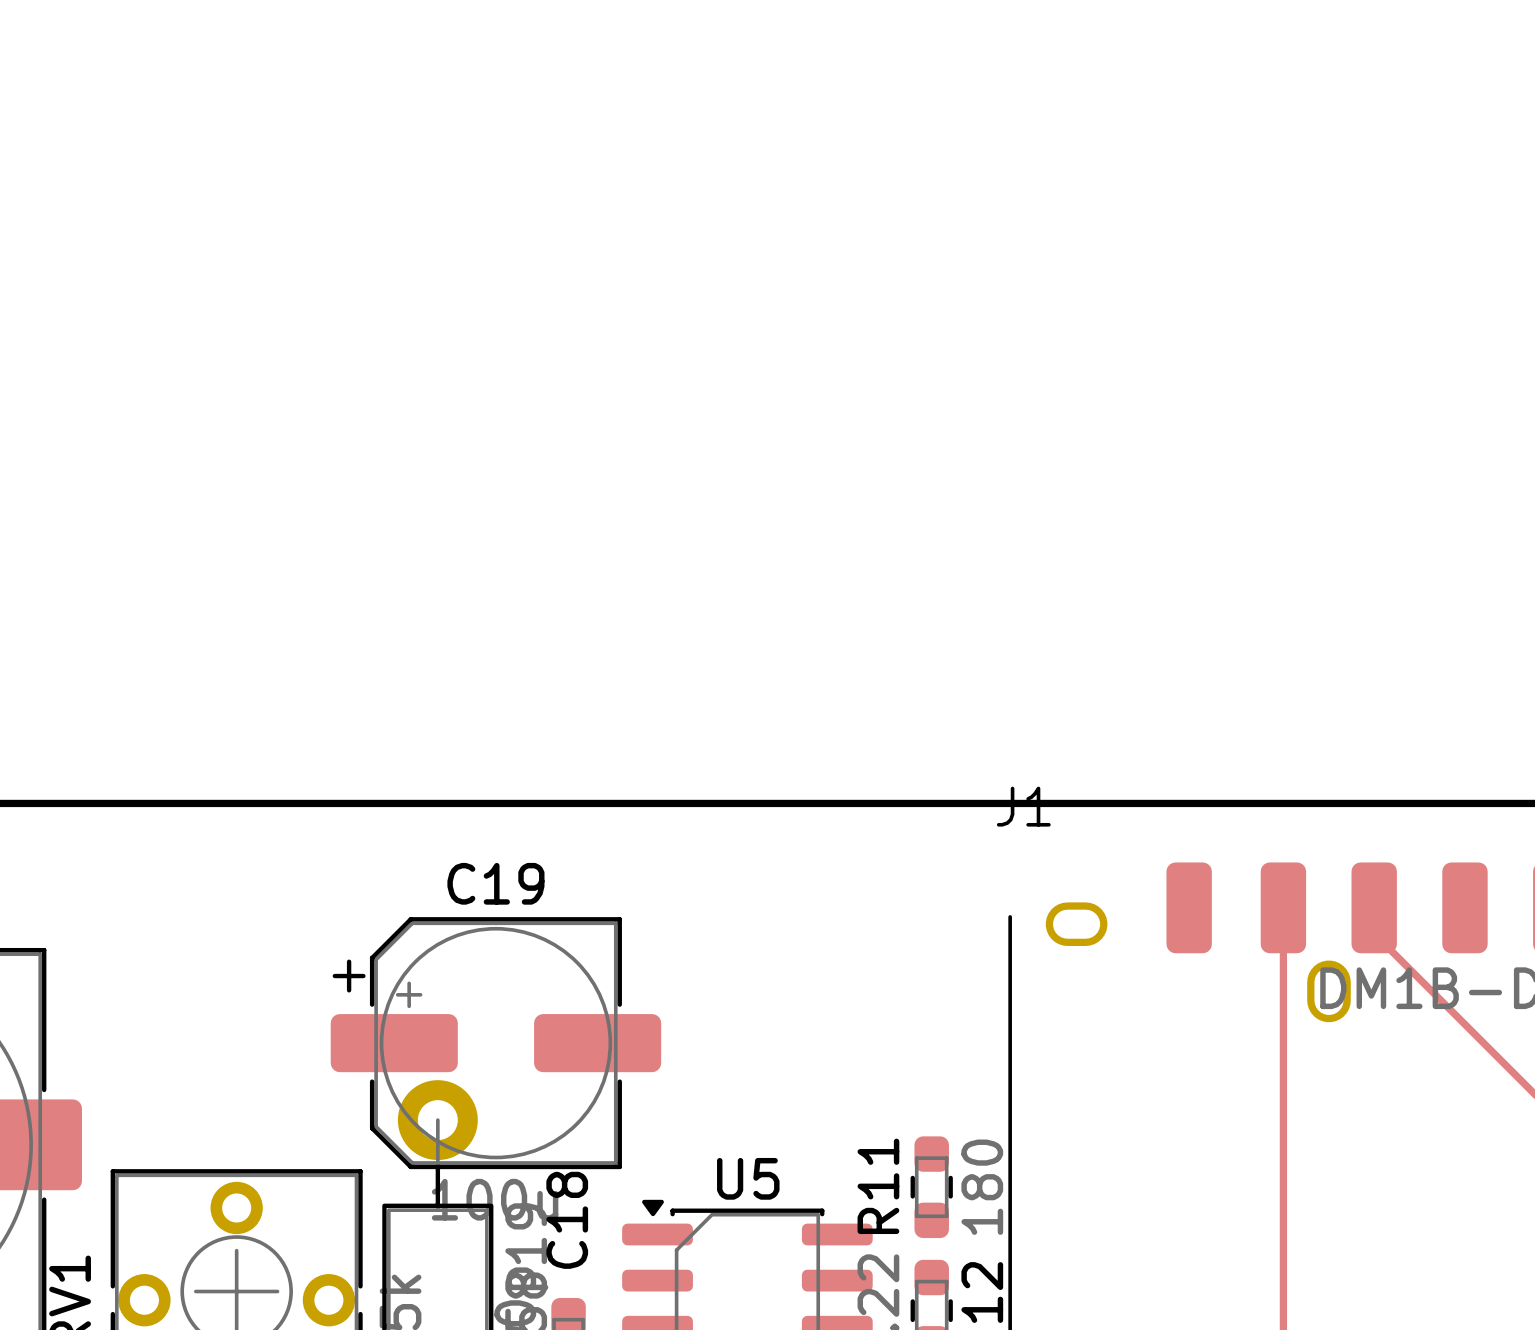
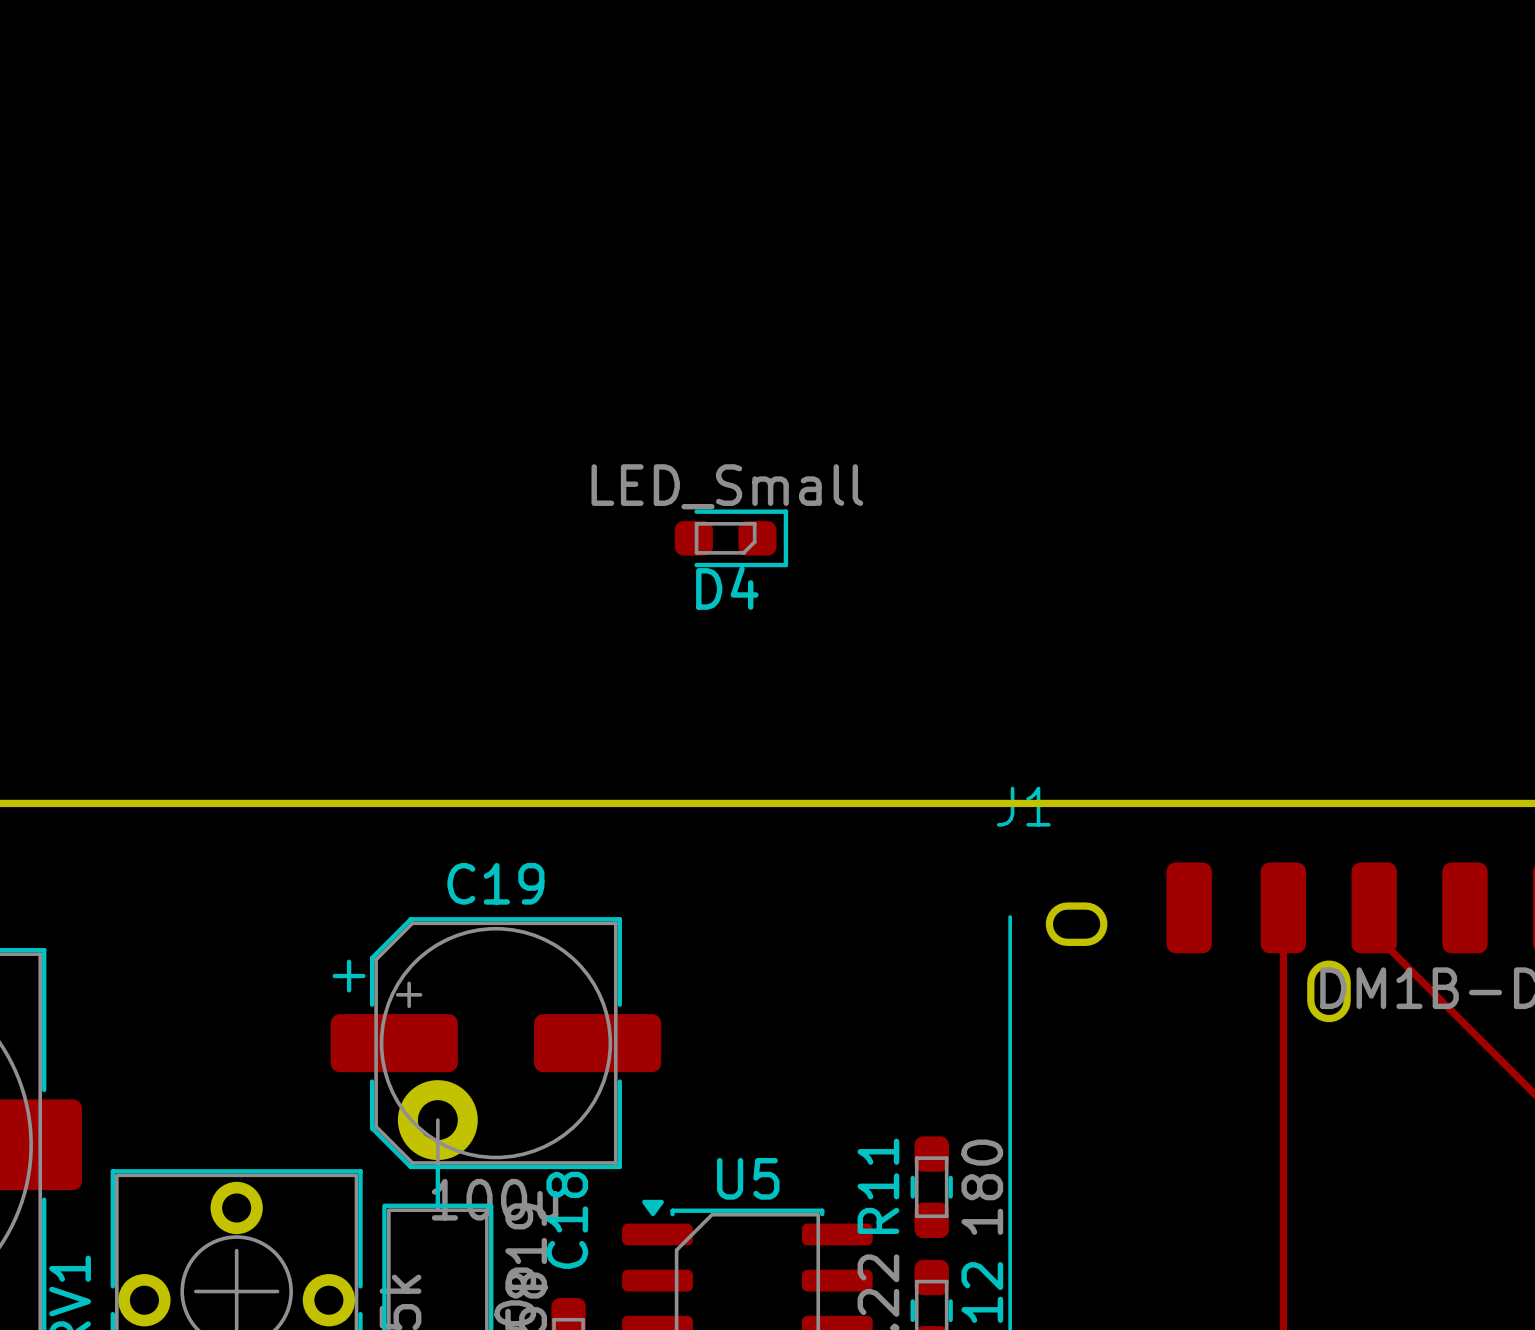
D4: none -> LED_Small (731, 538)

